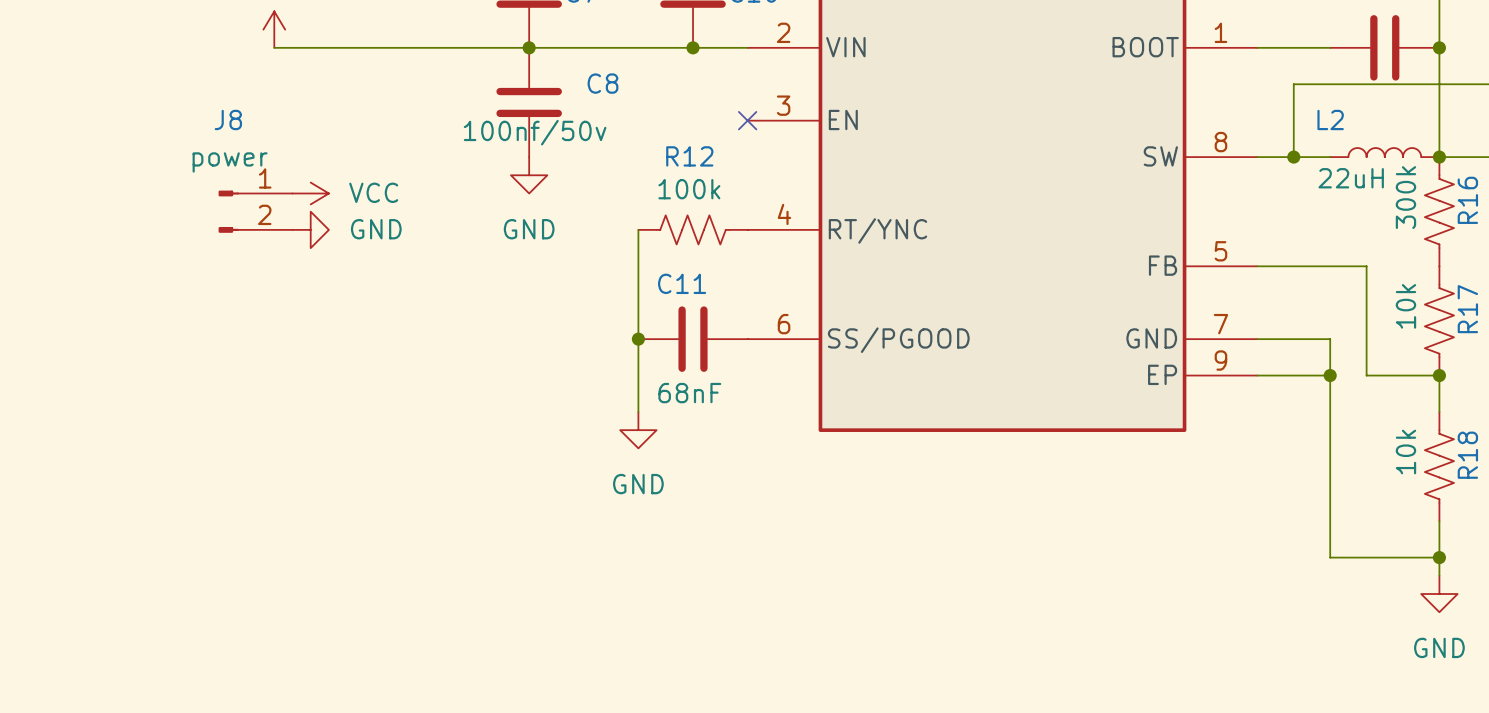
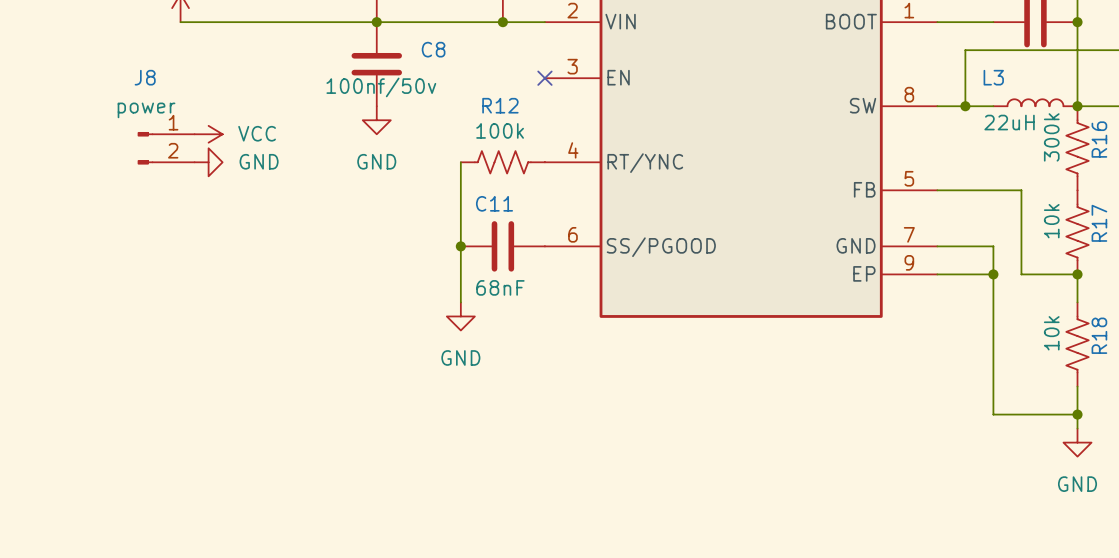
L2 name: L2 (1330, 119) -> L3 (993, 77)

